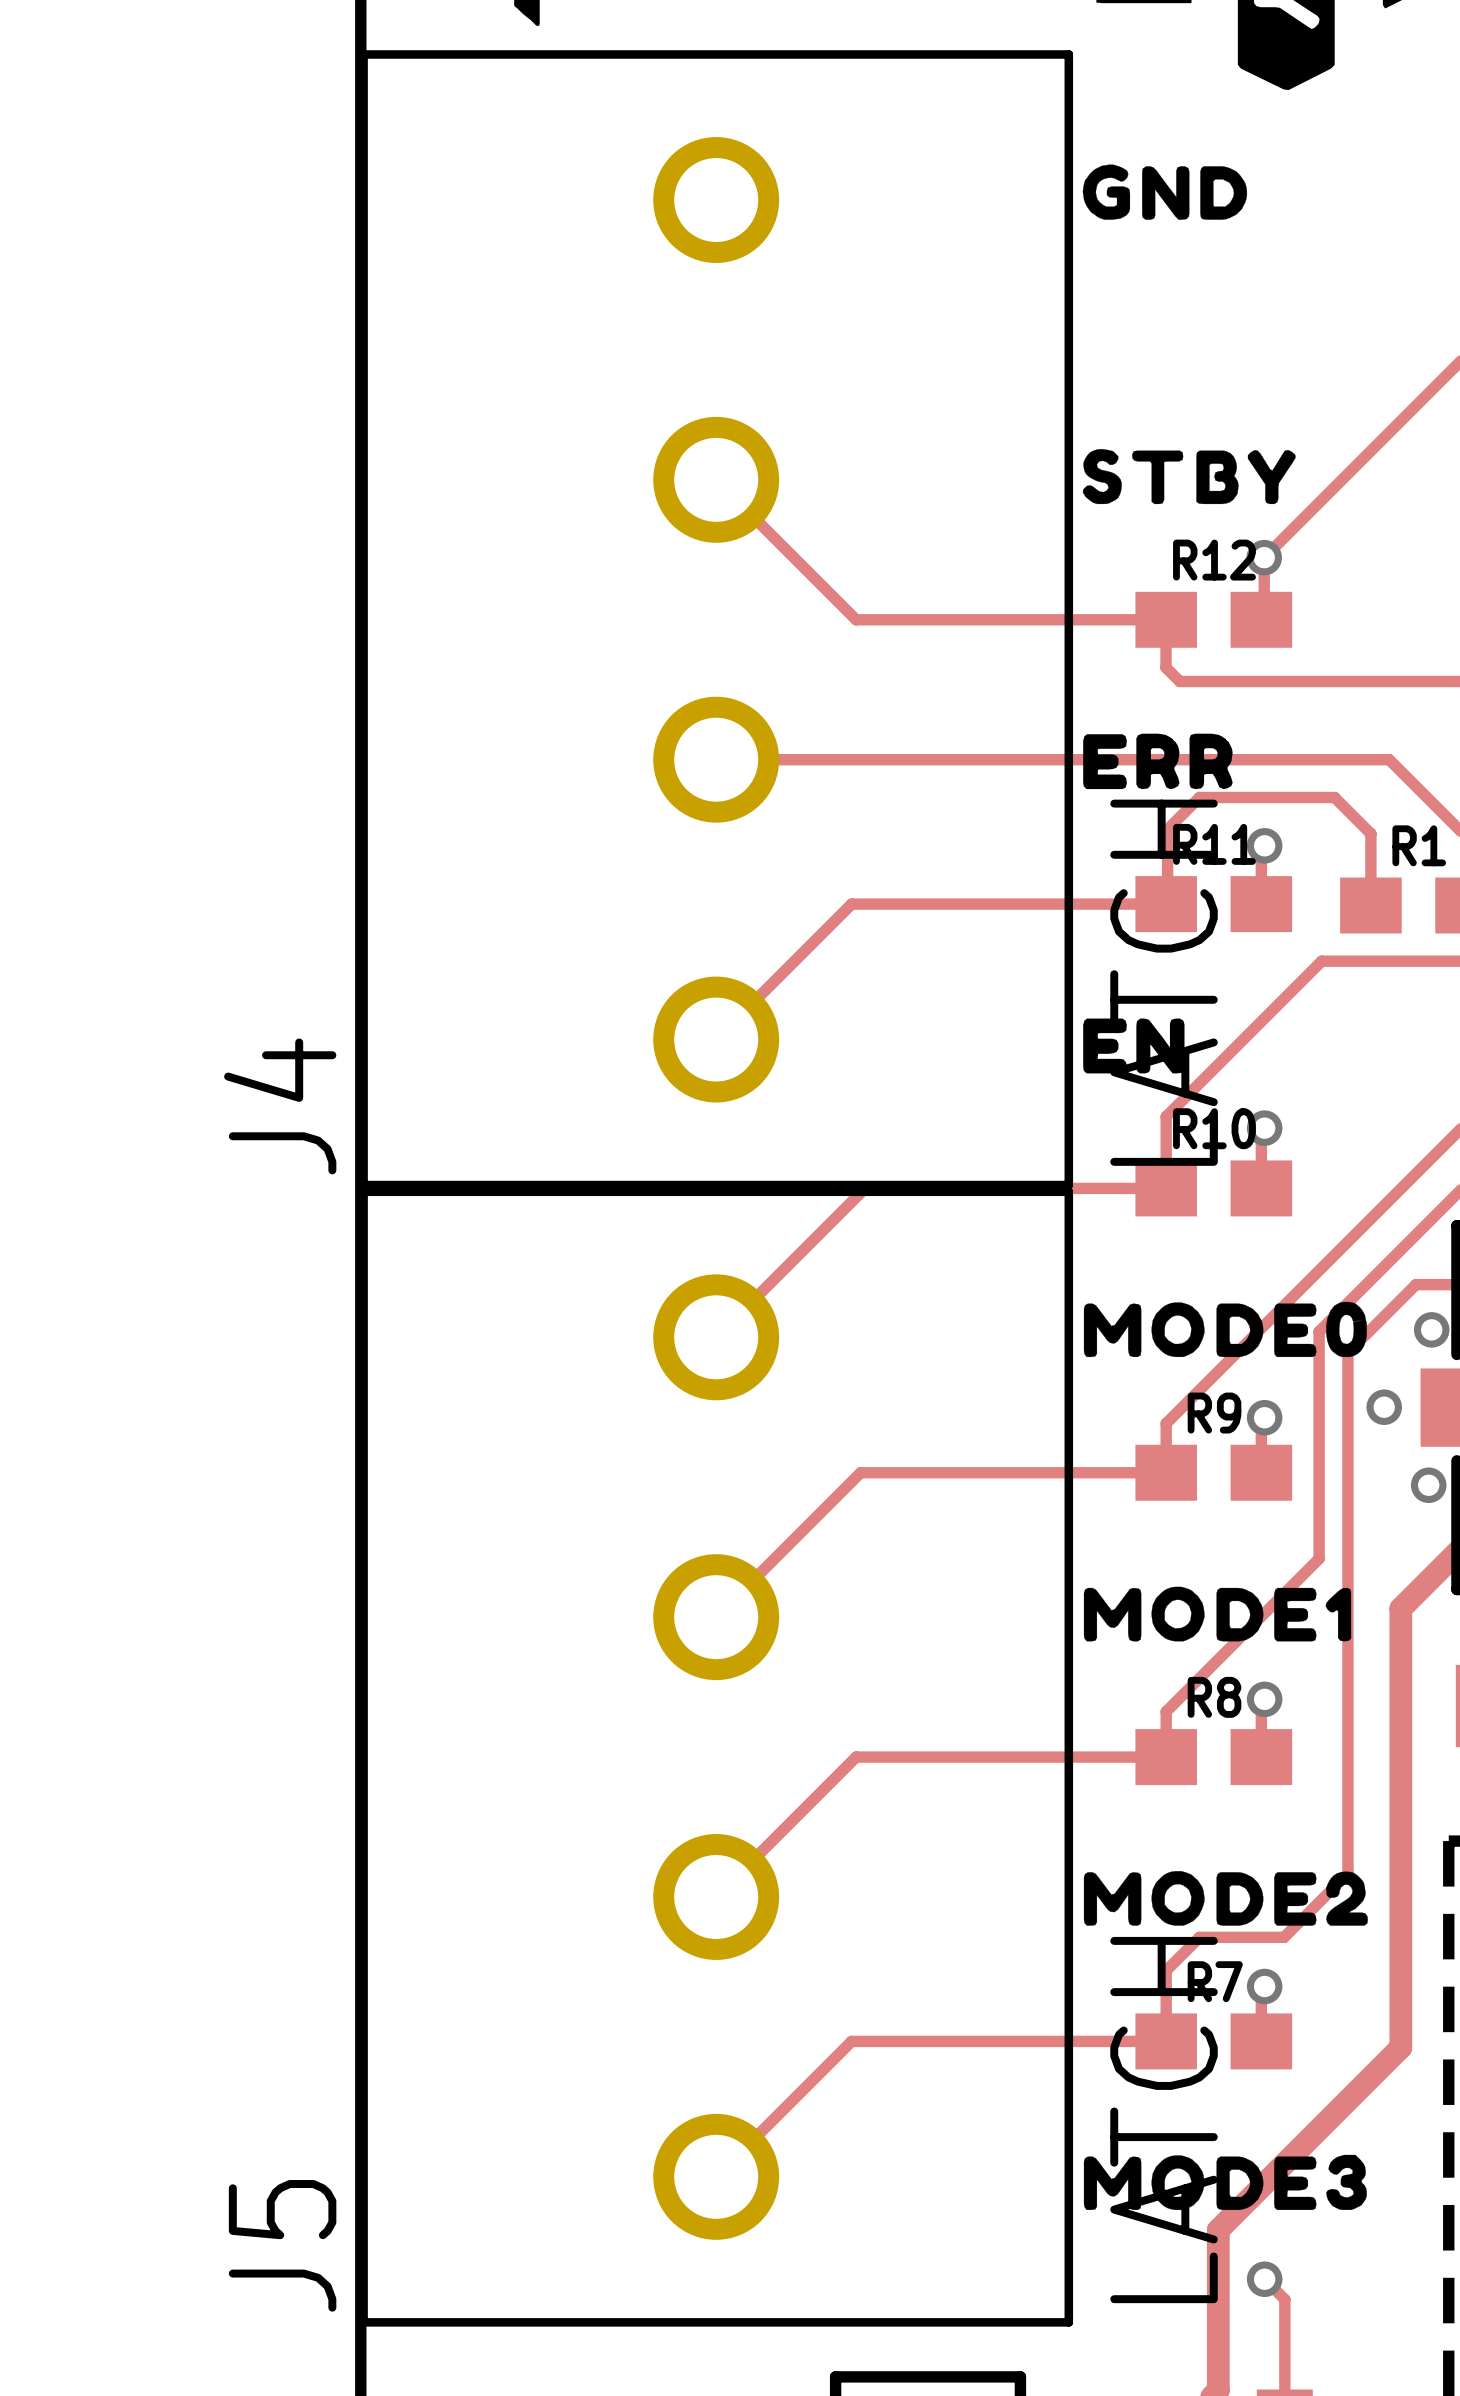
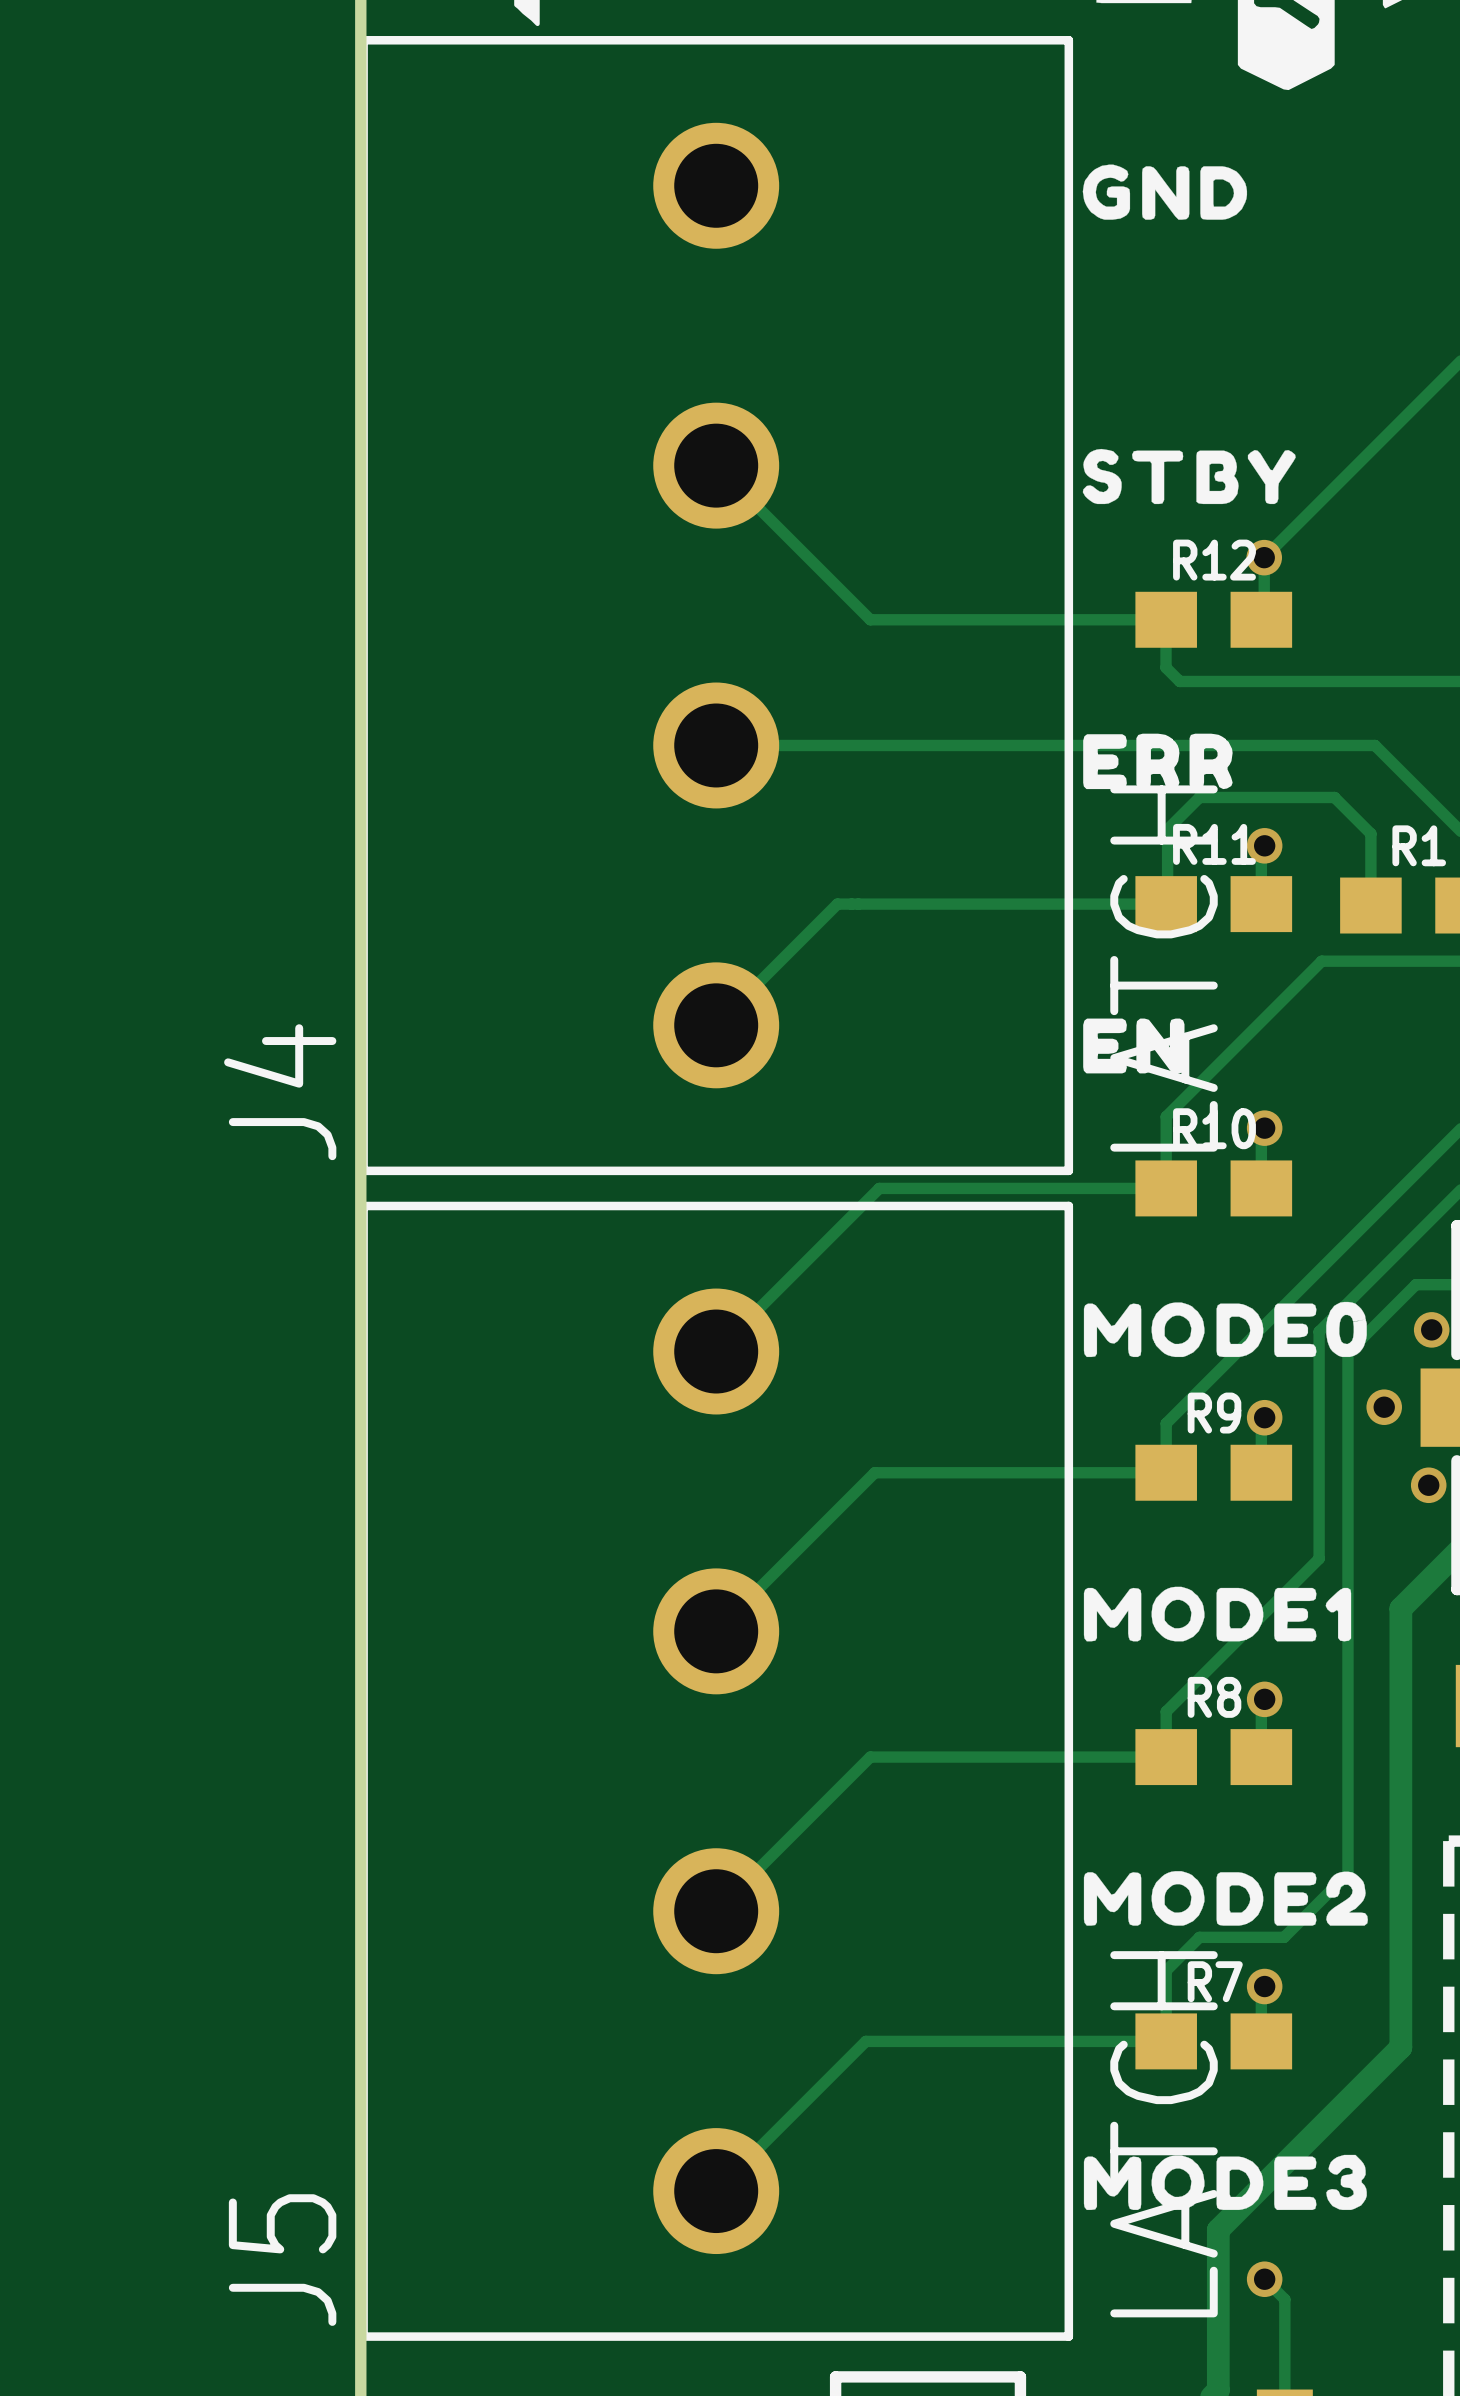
track: (716, 479) (856, 619) (870, 619) -> (716, 465) (870, 619)
J4 position: (716, 619) -> (716, 605)
track: (716, 759) (1389, 759) -> (716, 745) (1375, 745) (1389, 759)
track: (851, 904) (716, 1039) -> (851, 904) (837, 904) (716, 1025)
track: (879, 1188) (865, 1188) (716, 1337) -> (879, 1188) (716, 1351)
track: (874, 1472) (860, 1472) (716, 1617) -> (874, 1472) (716, 1631)
J5 position: (716, 1757) -> (716, 1771)
track: (870, 1757) (856, 1757) (716, 1897) -> (870, 1757) (716, 1911)
track: (865, 2041) (851, 2041) (716, 2176) -> (865, 2041) (716, 2191)

